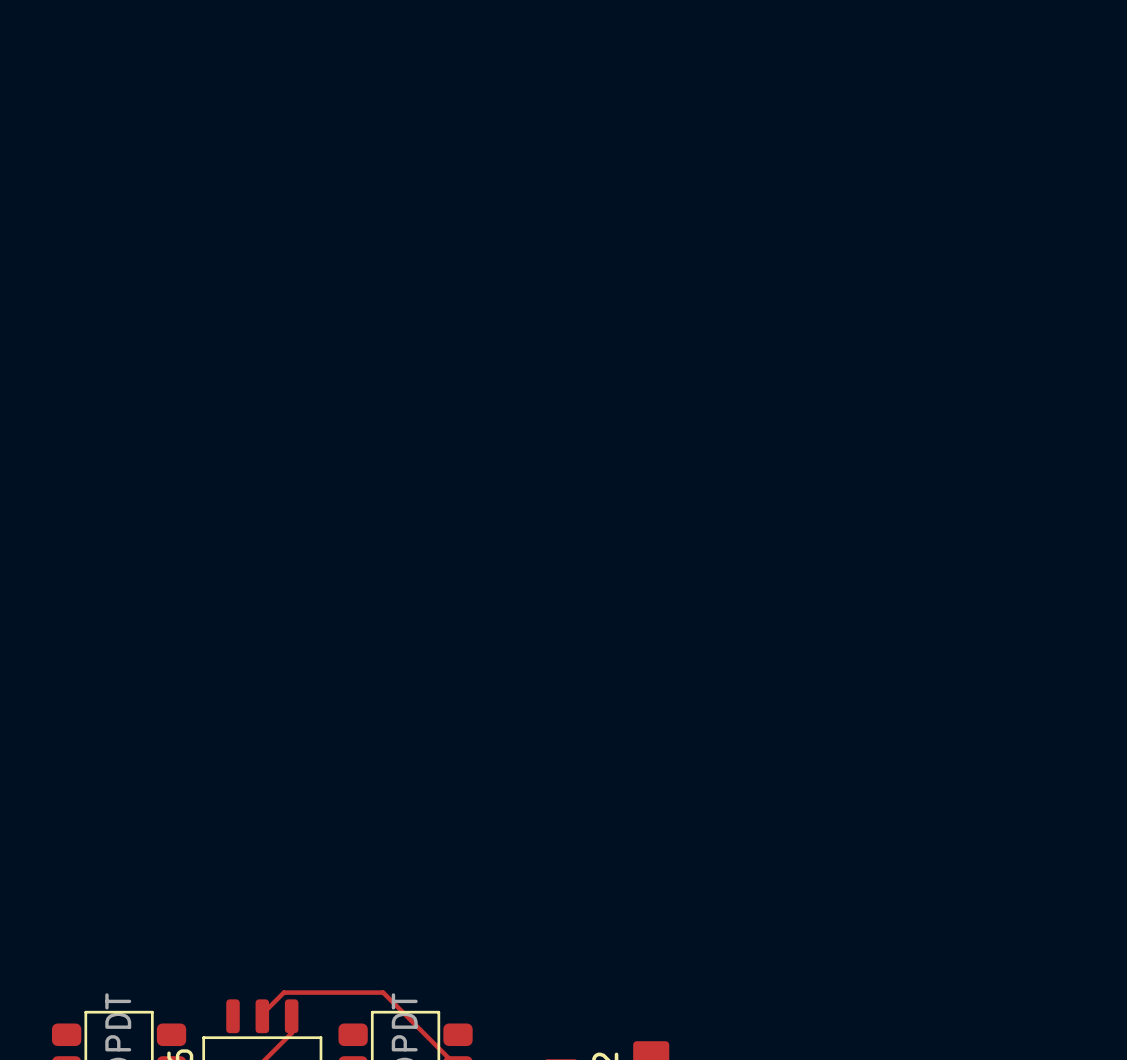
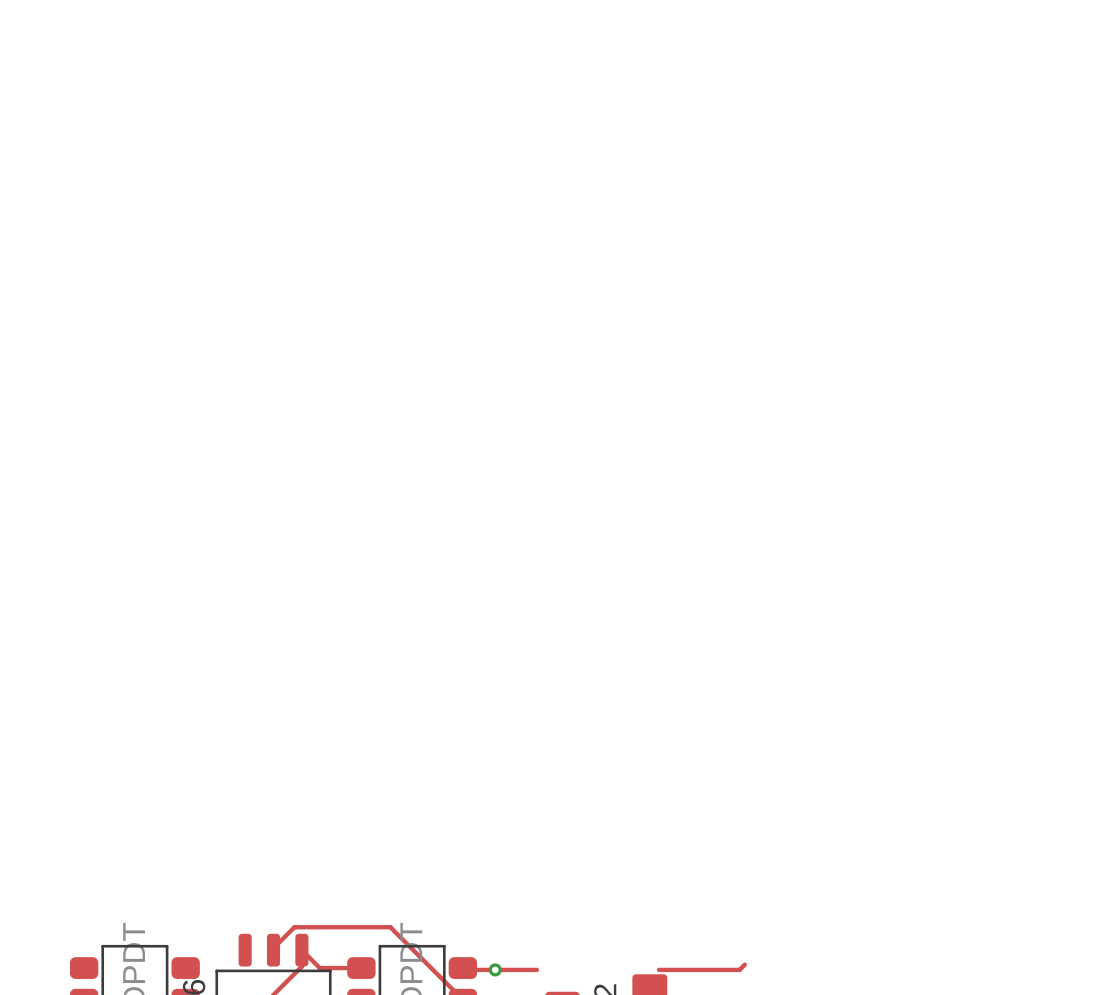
top track: none -> (301, 950) (319, 968) (361, 968)
top track: none -> (744, 964) (739, 969) (658, 969)
top track: none -> (462, 968) (464, 969) (536, 969)
via: none -> (495, 969)

